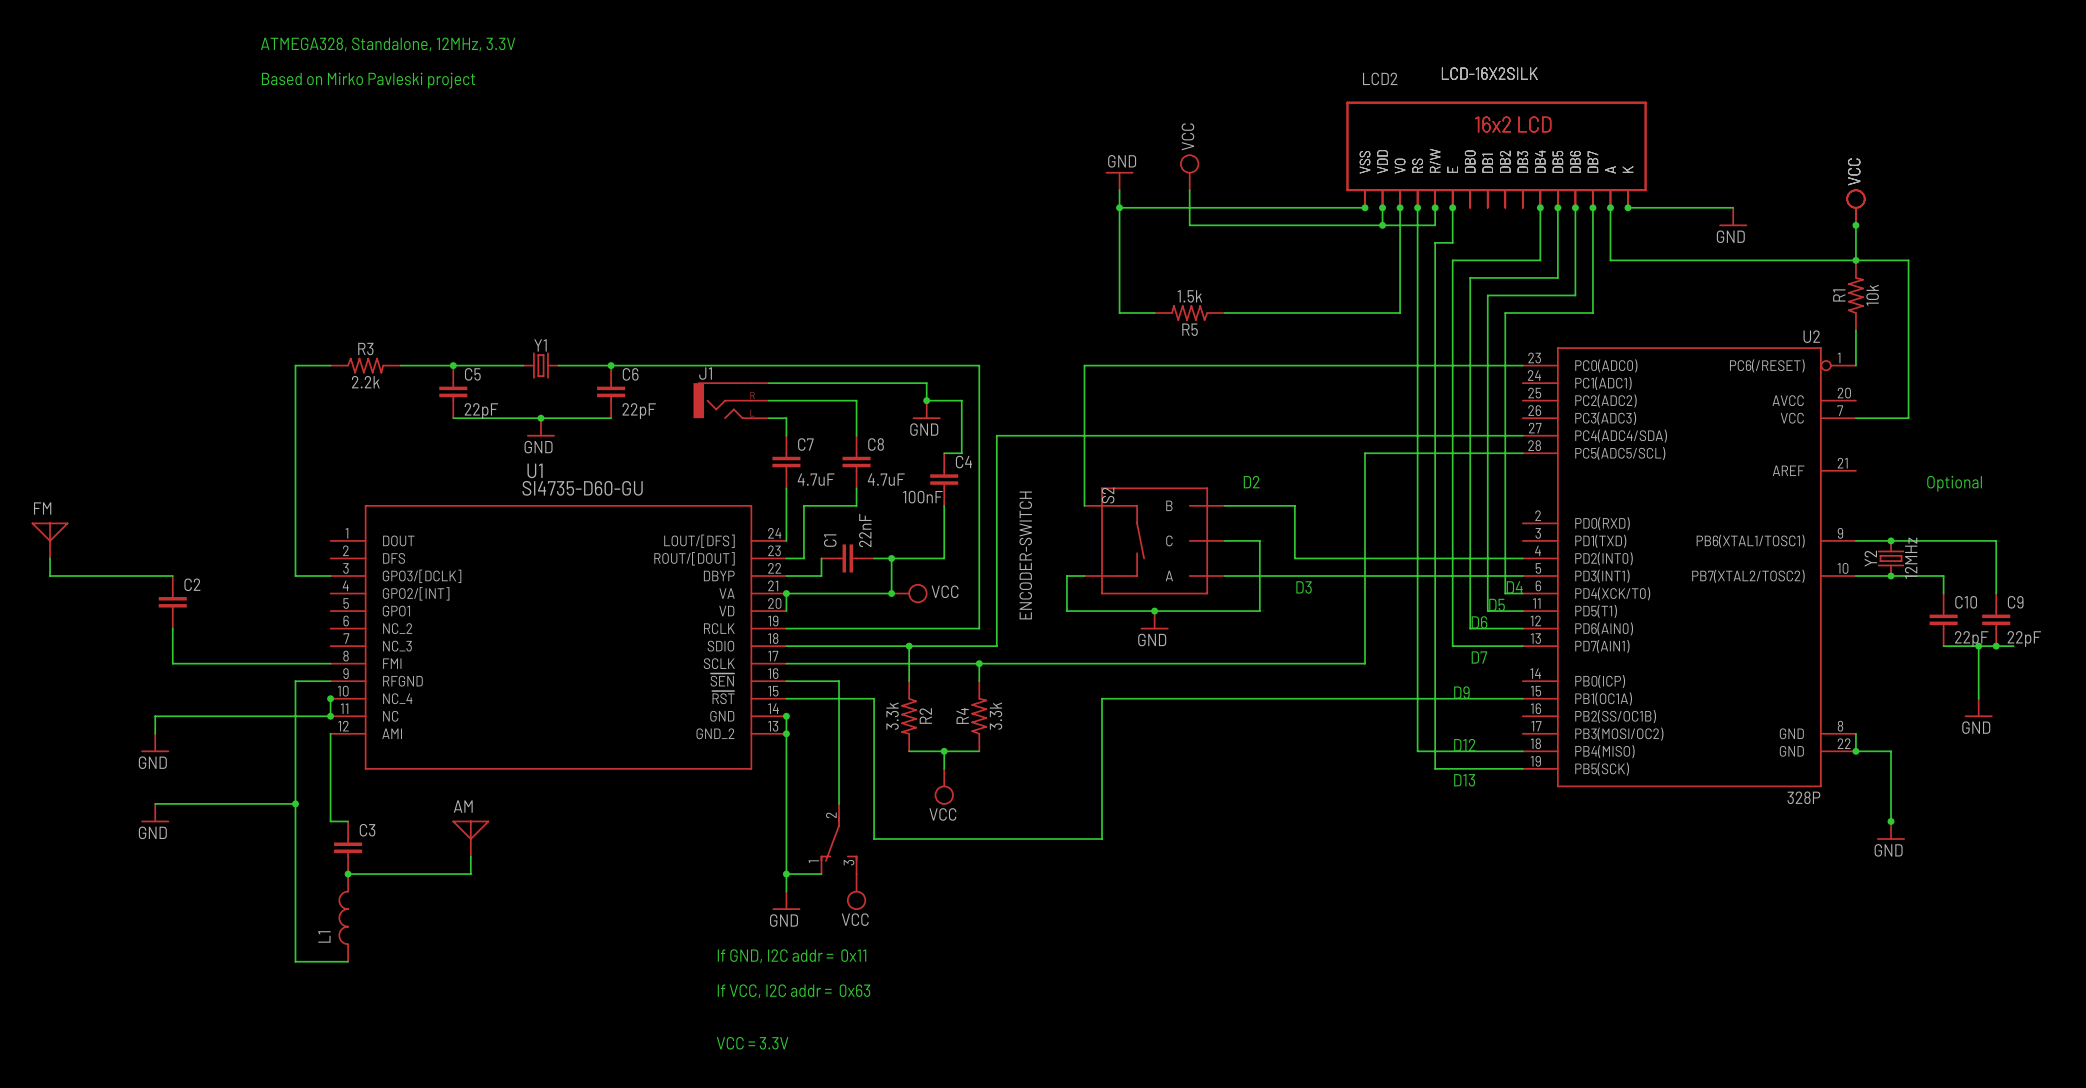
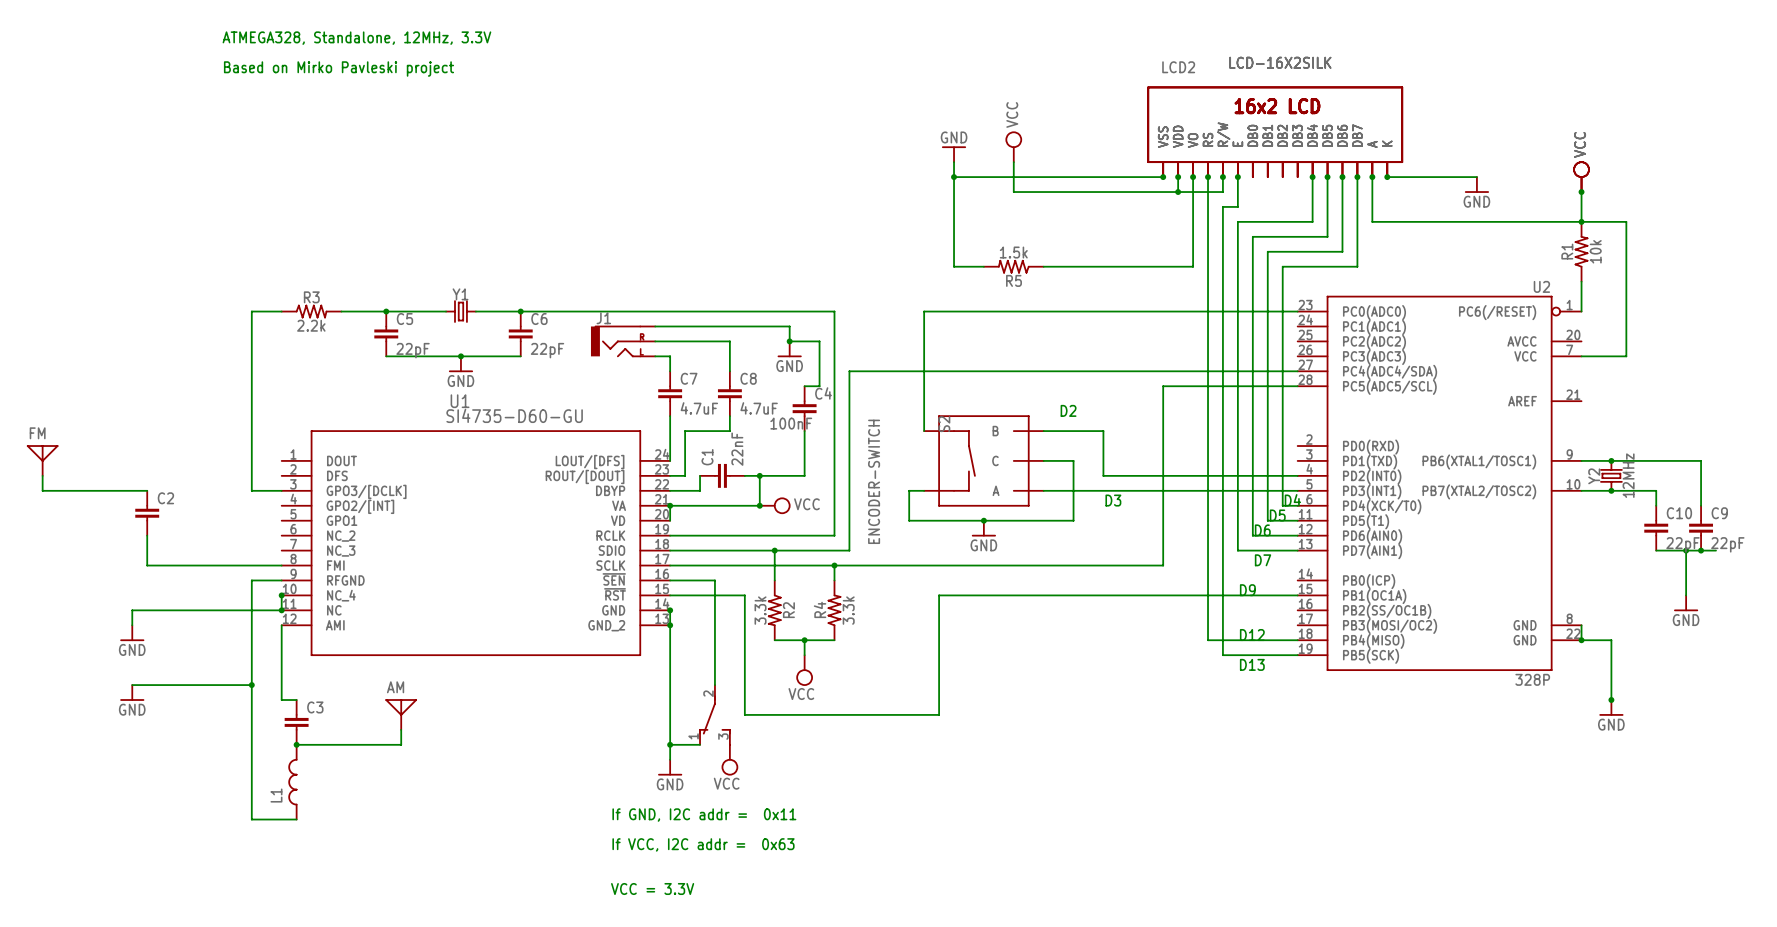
text: Optional (1954, 483) -> none

